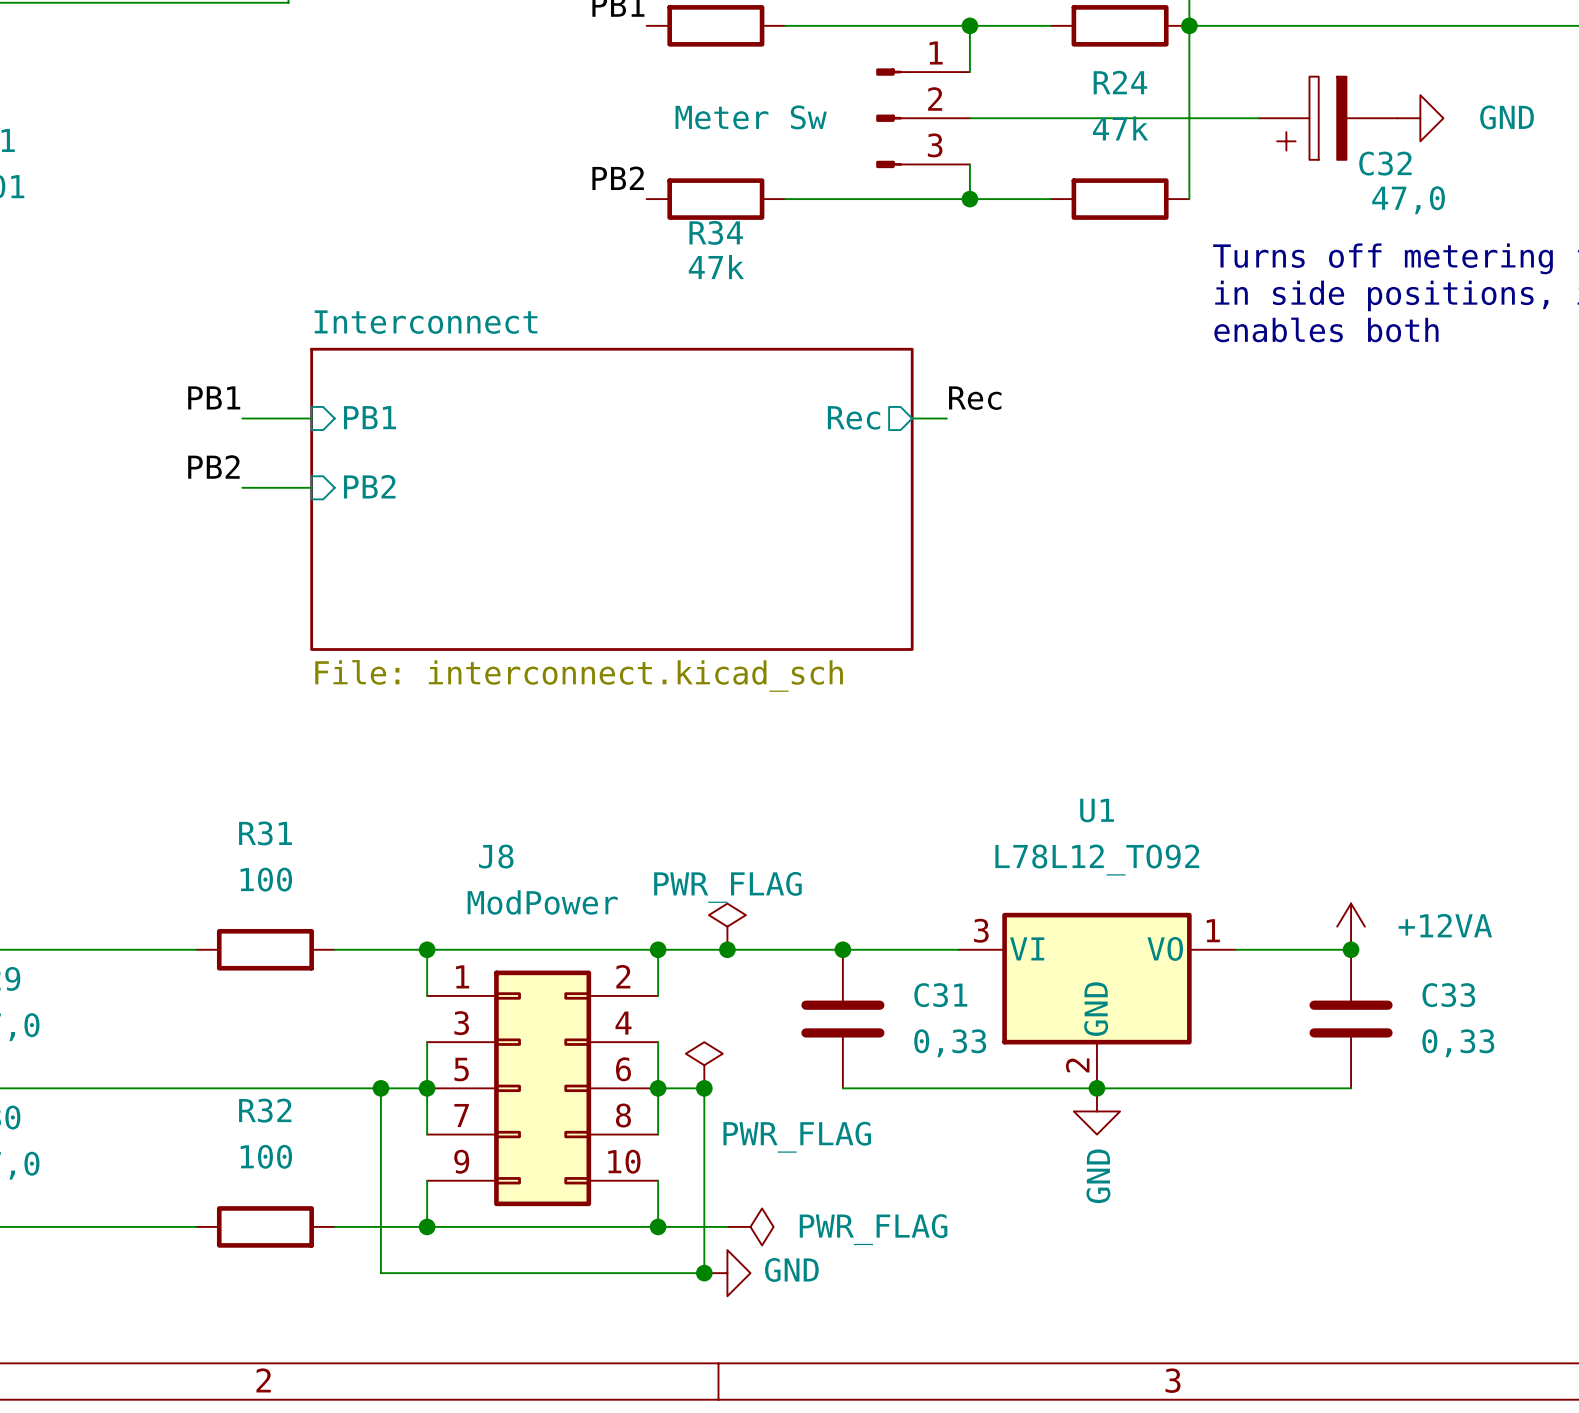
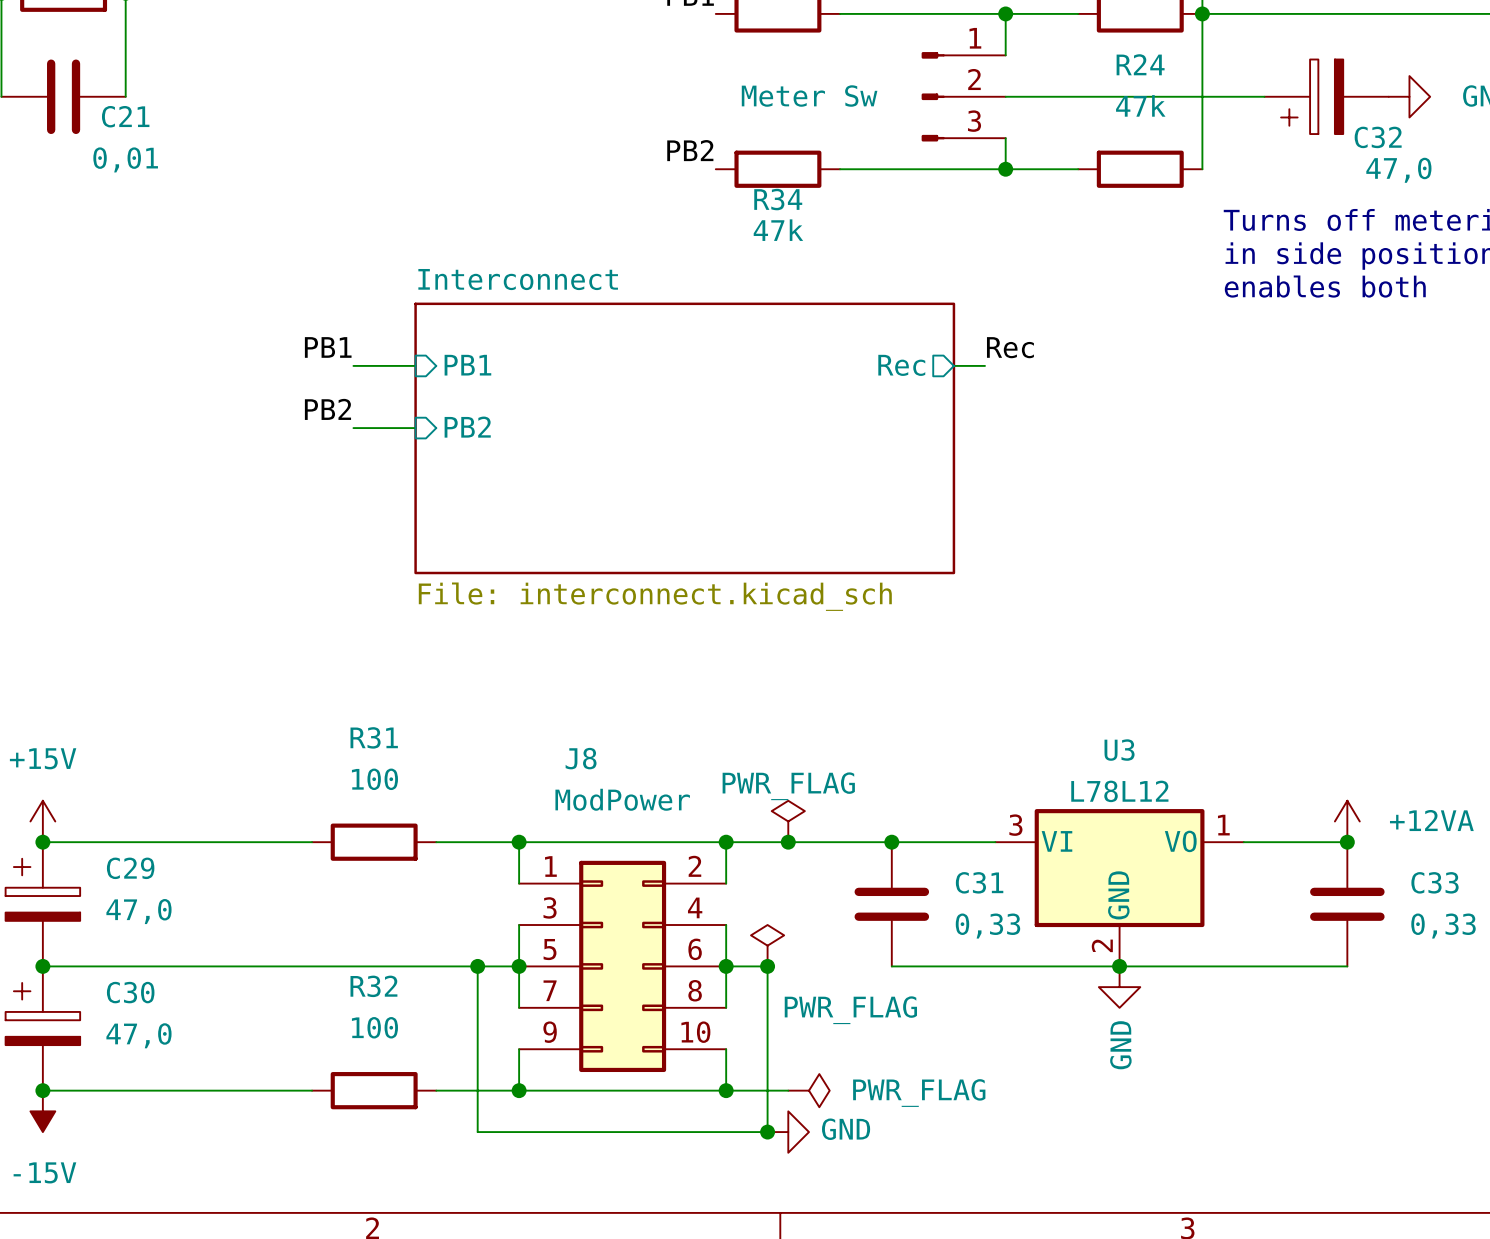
U1 name: U1 (1097, 810) -> U3 (1119, 750)
U1 value: L78L12_TO92 (1097, 860) -> L78L12 (1119, 791)

